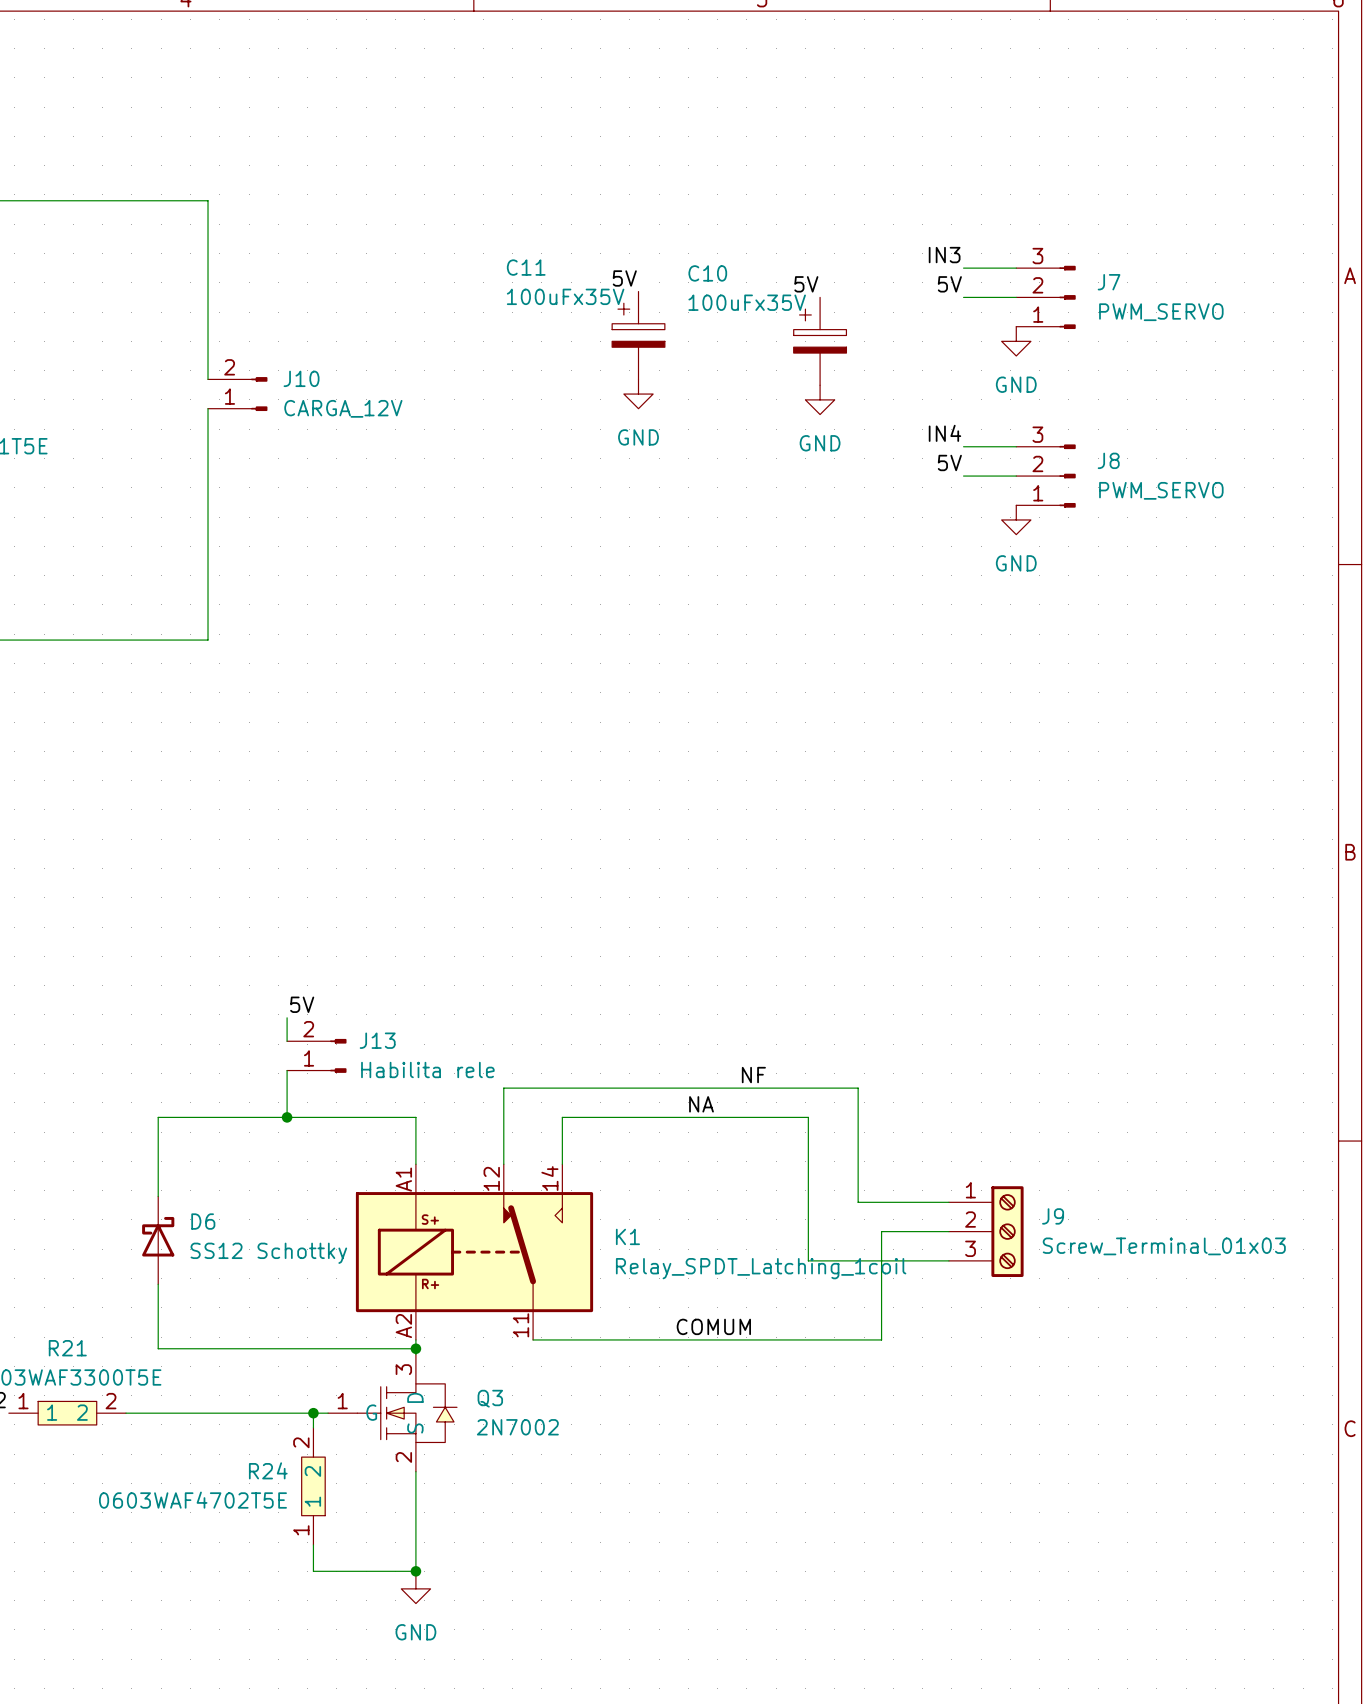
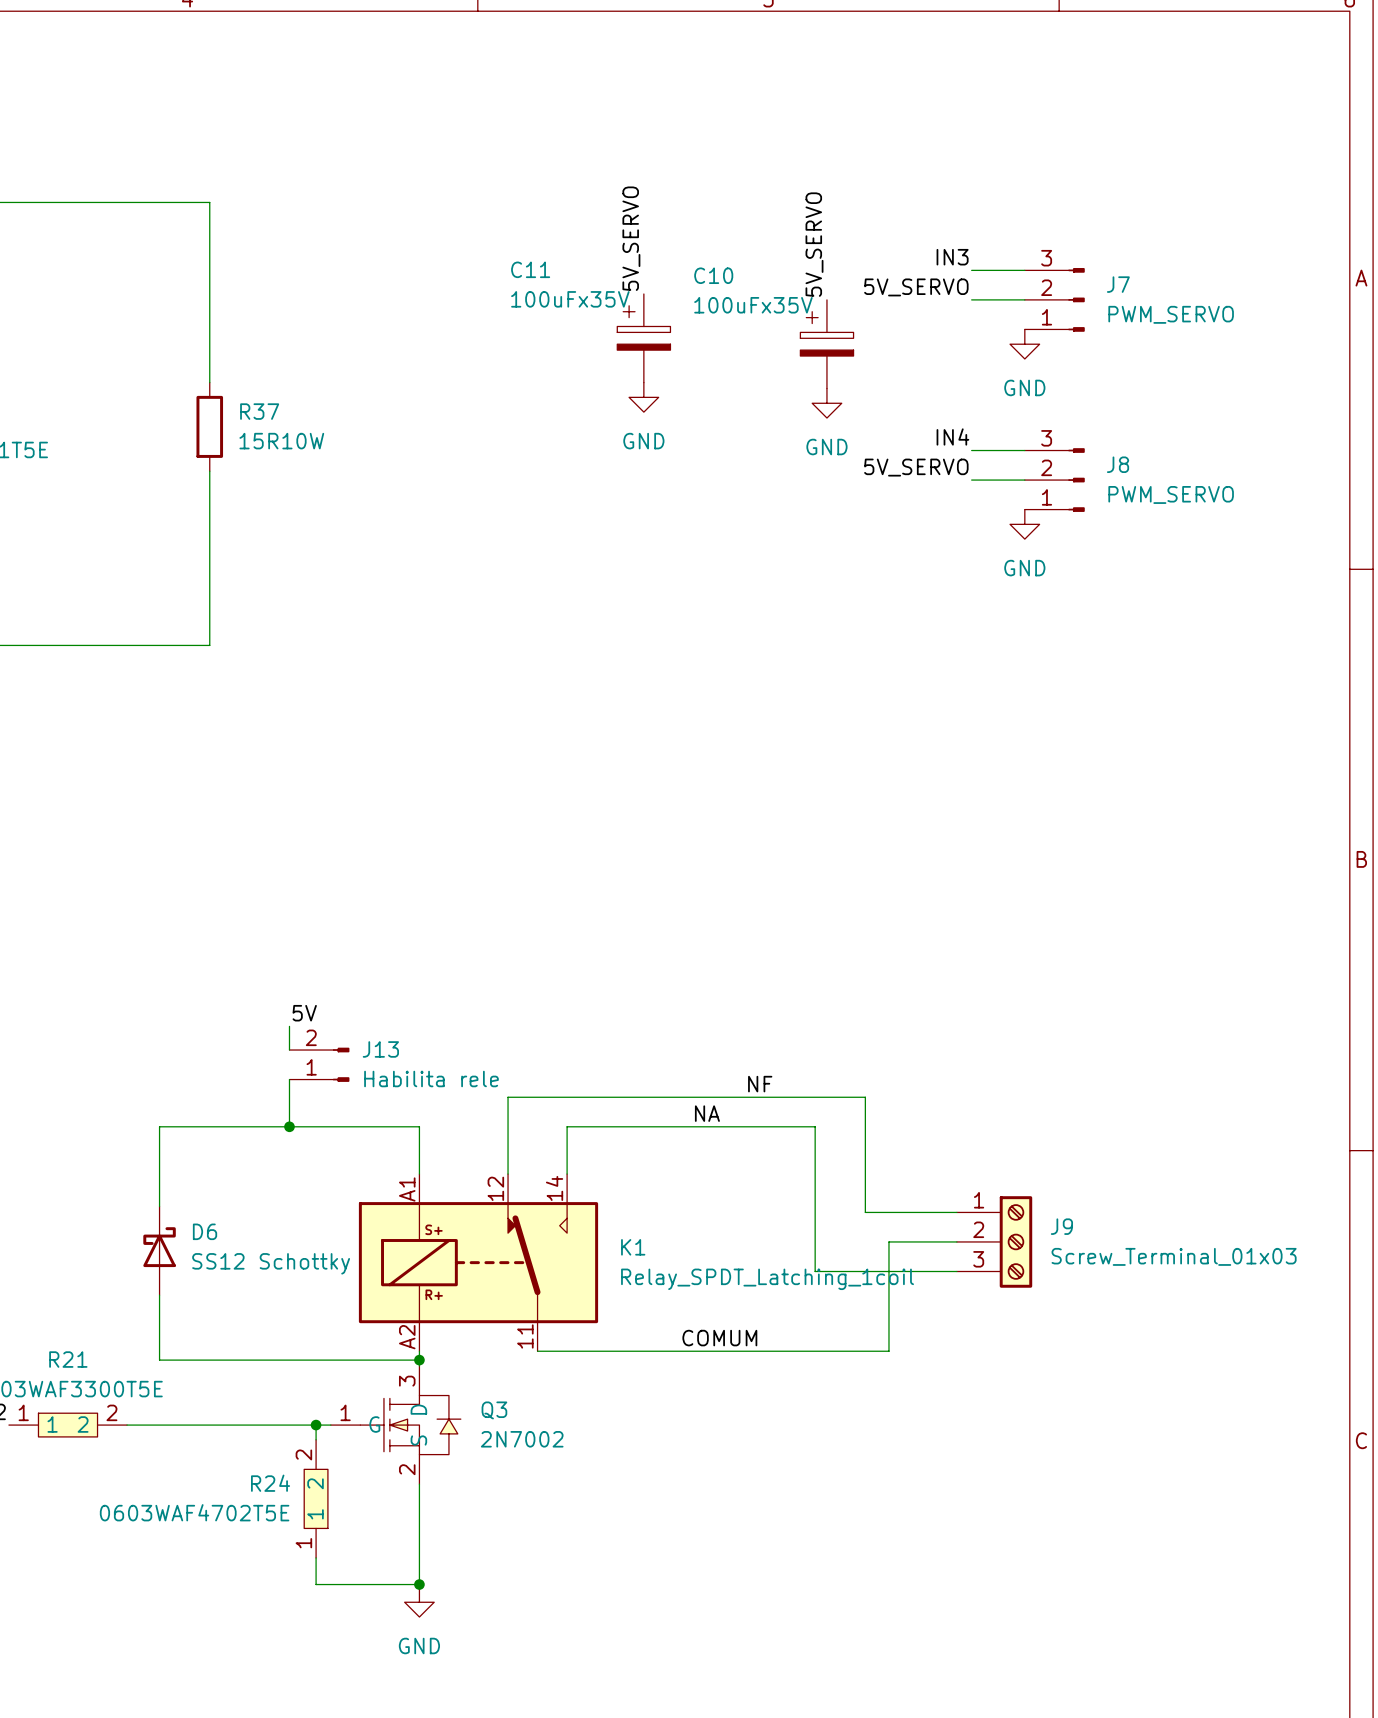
label: 5V (624, 278) -> 5V_SERVO (631, 238)
label: 5V (806, 284) -> 5V_SERVO (814, 244)
label: 5V (949, 284) -> 5V_SERVO (916, 287)
J10: CARGA_12V (237, 394) -> none
wire: (208, 408) (208, 467) -> none
R37: none -> 15R10W (209, 426)
label: 5V (949, 462) -> 5V_SERVO (916, 467)

